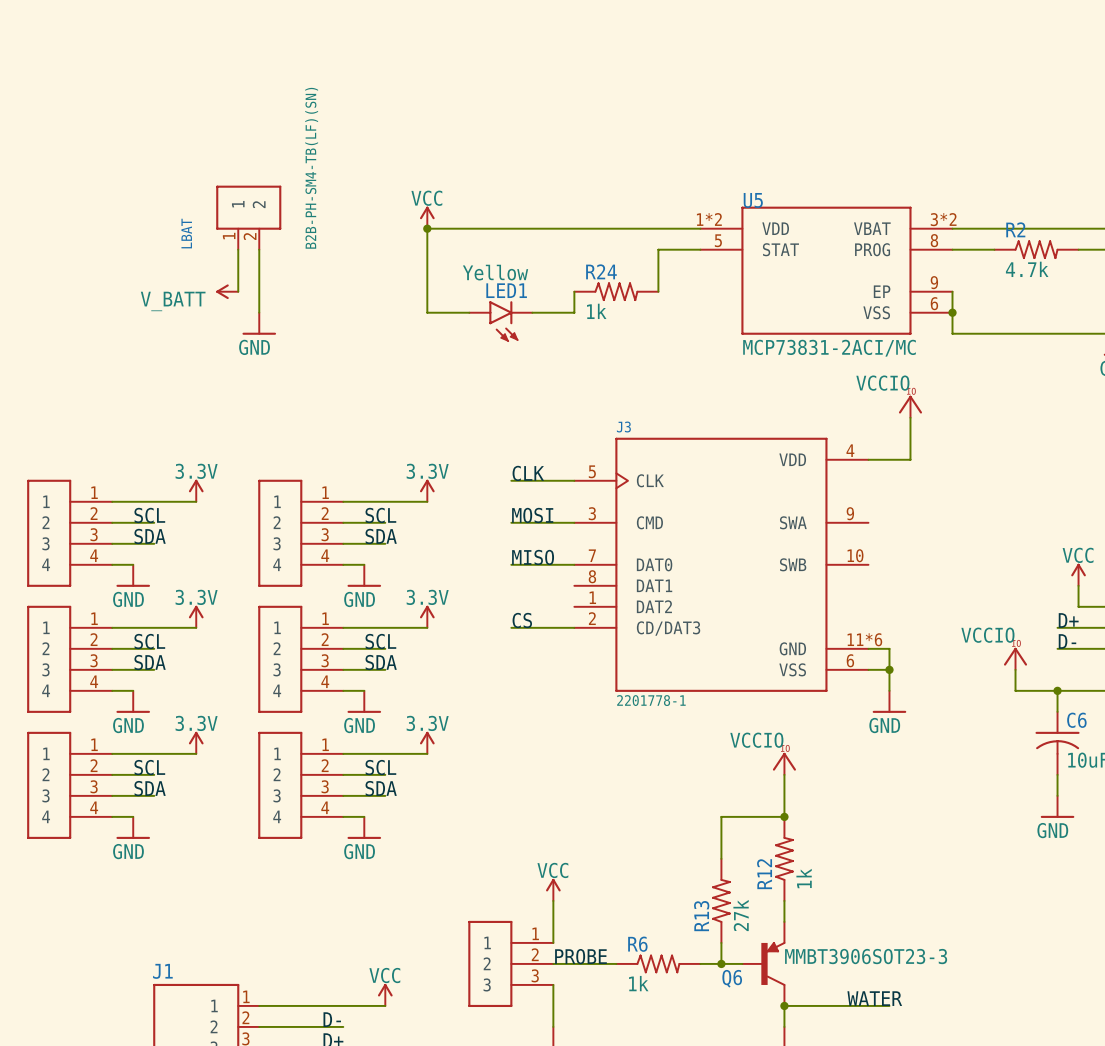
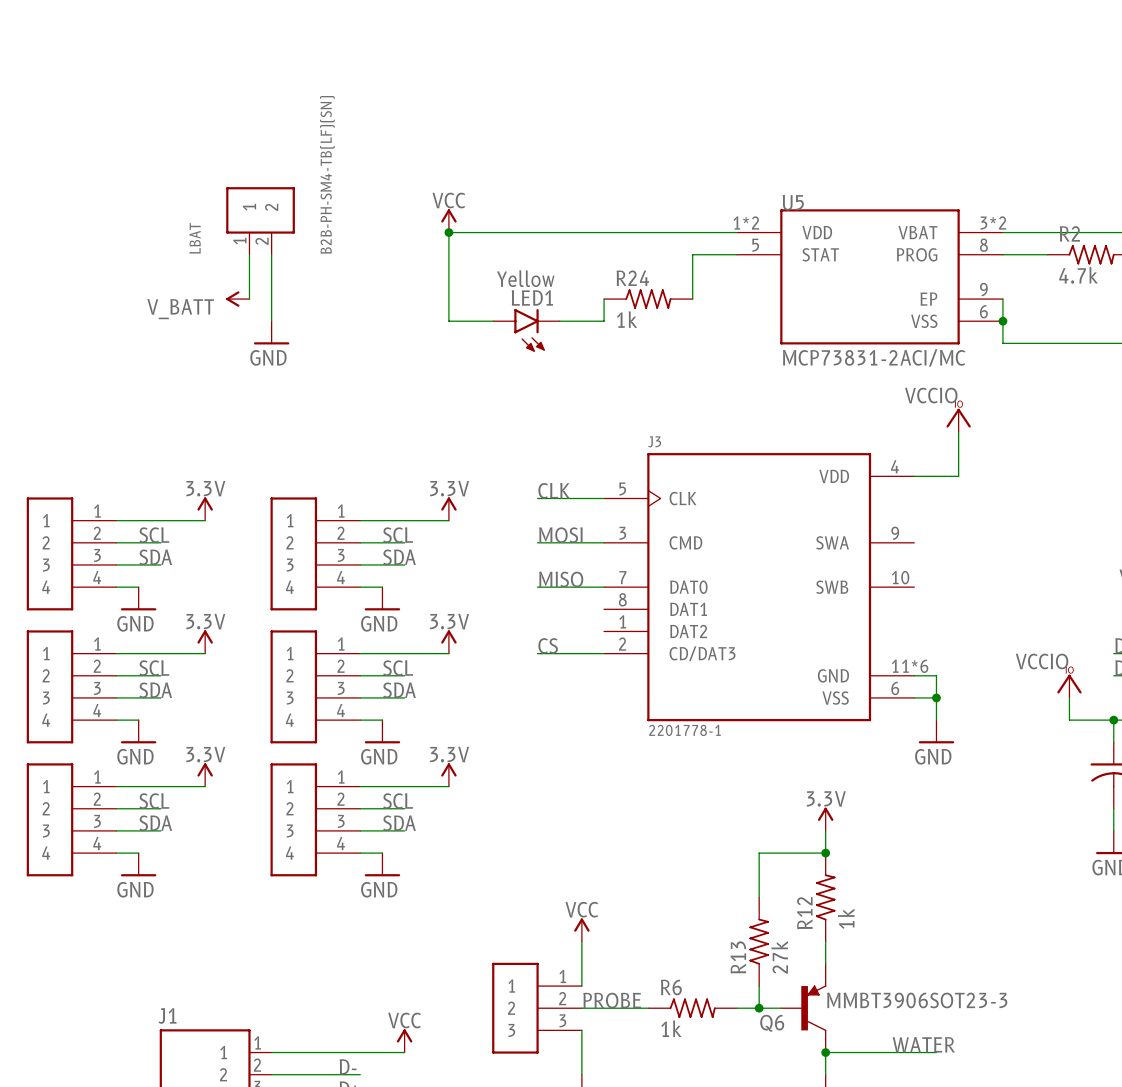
power symbol: VCCIO (784, 763) -> none
power symbol: none -> 3.3V (825, 819)

